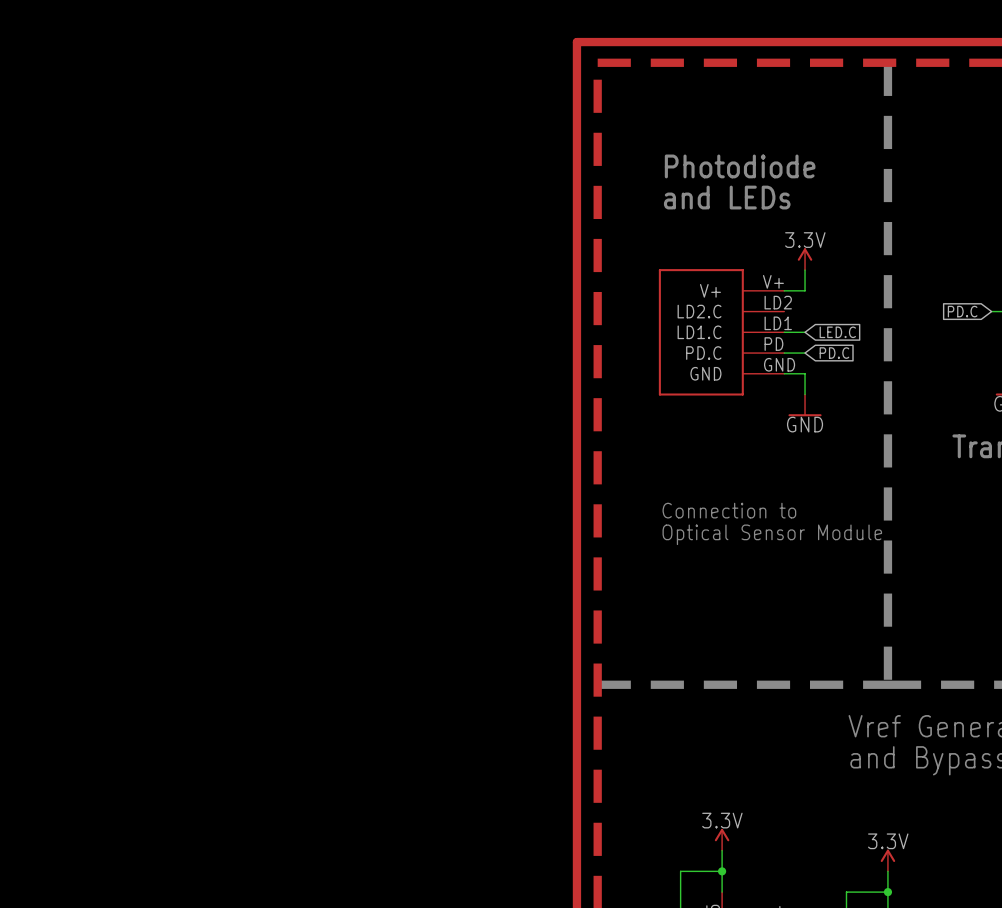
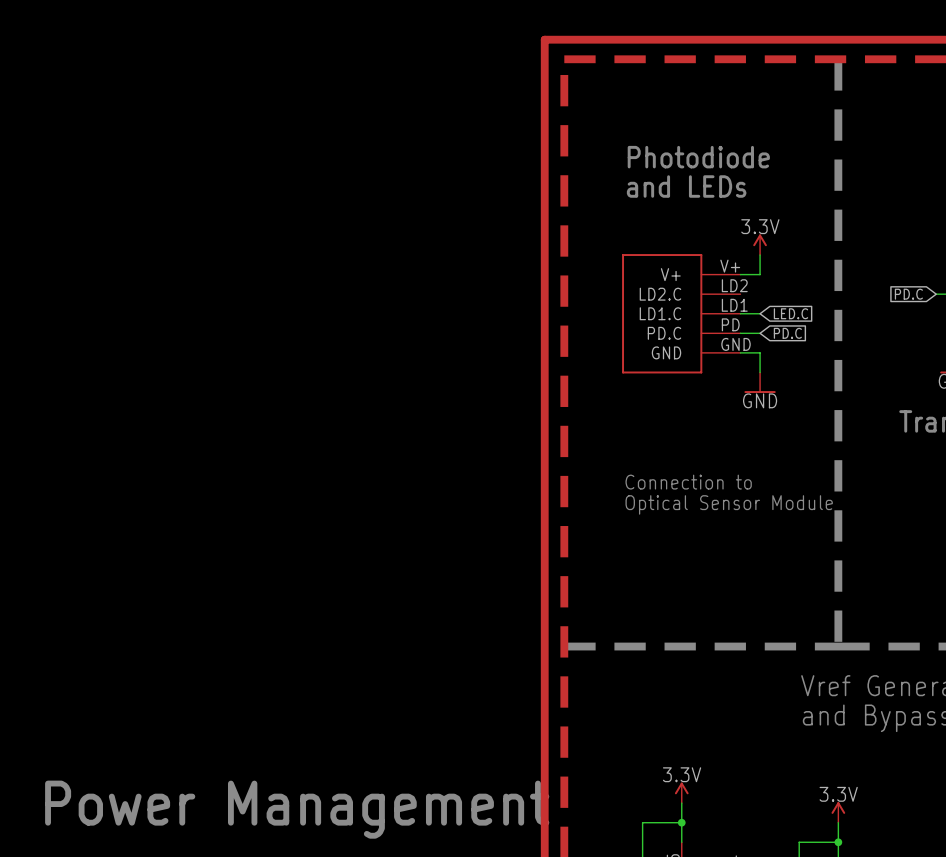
text: none -> Power Management (297, 809)

